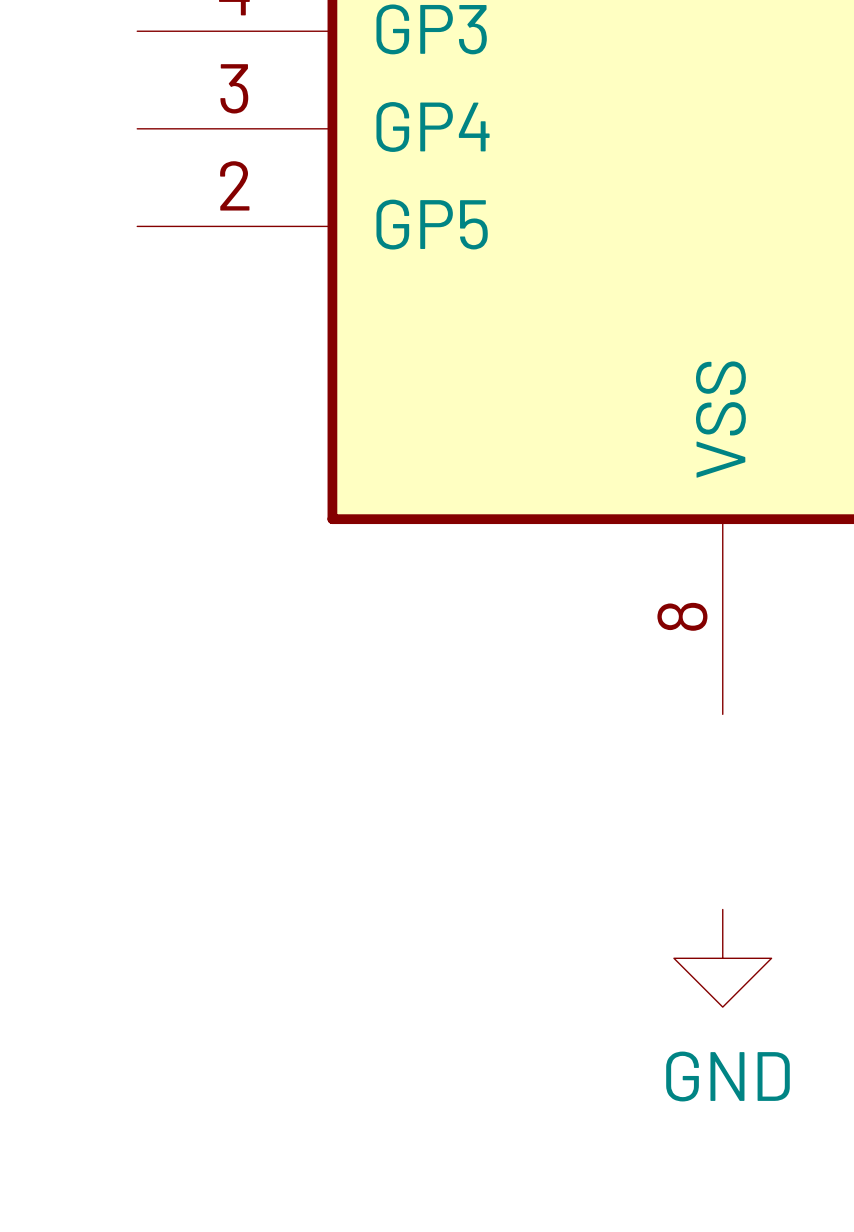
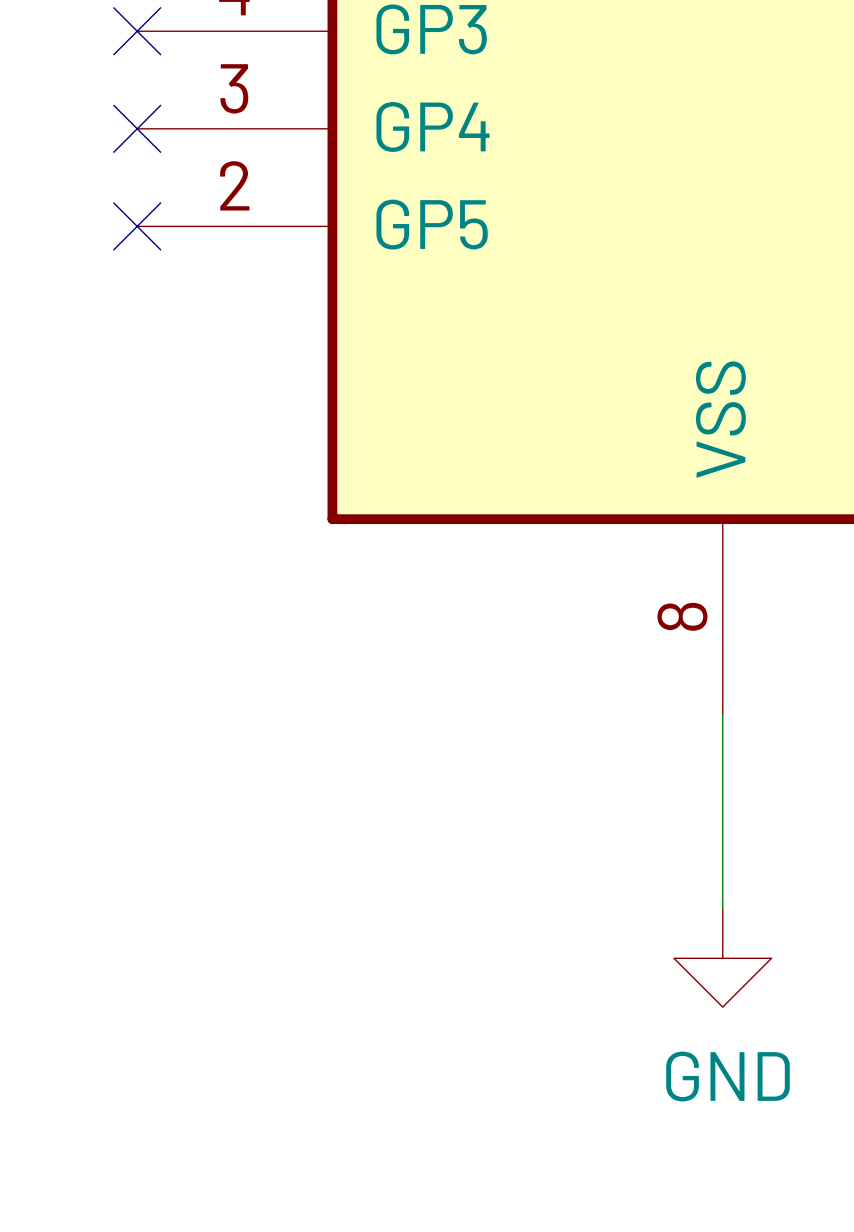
no-connect mark: none -> (137, 31)
no-connect mark: none -> (137, 128)
no-connect mark: none -> (137, 226)
wire: none -> (722, 714) (722, 909)

